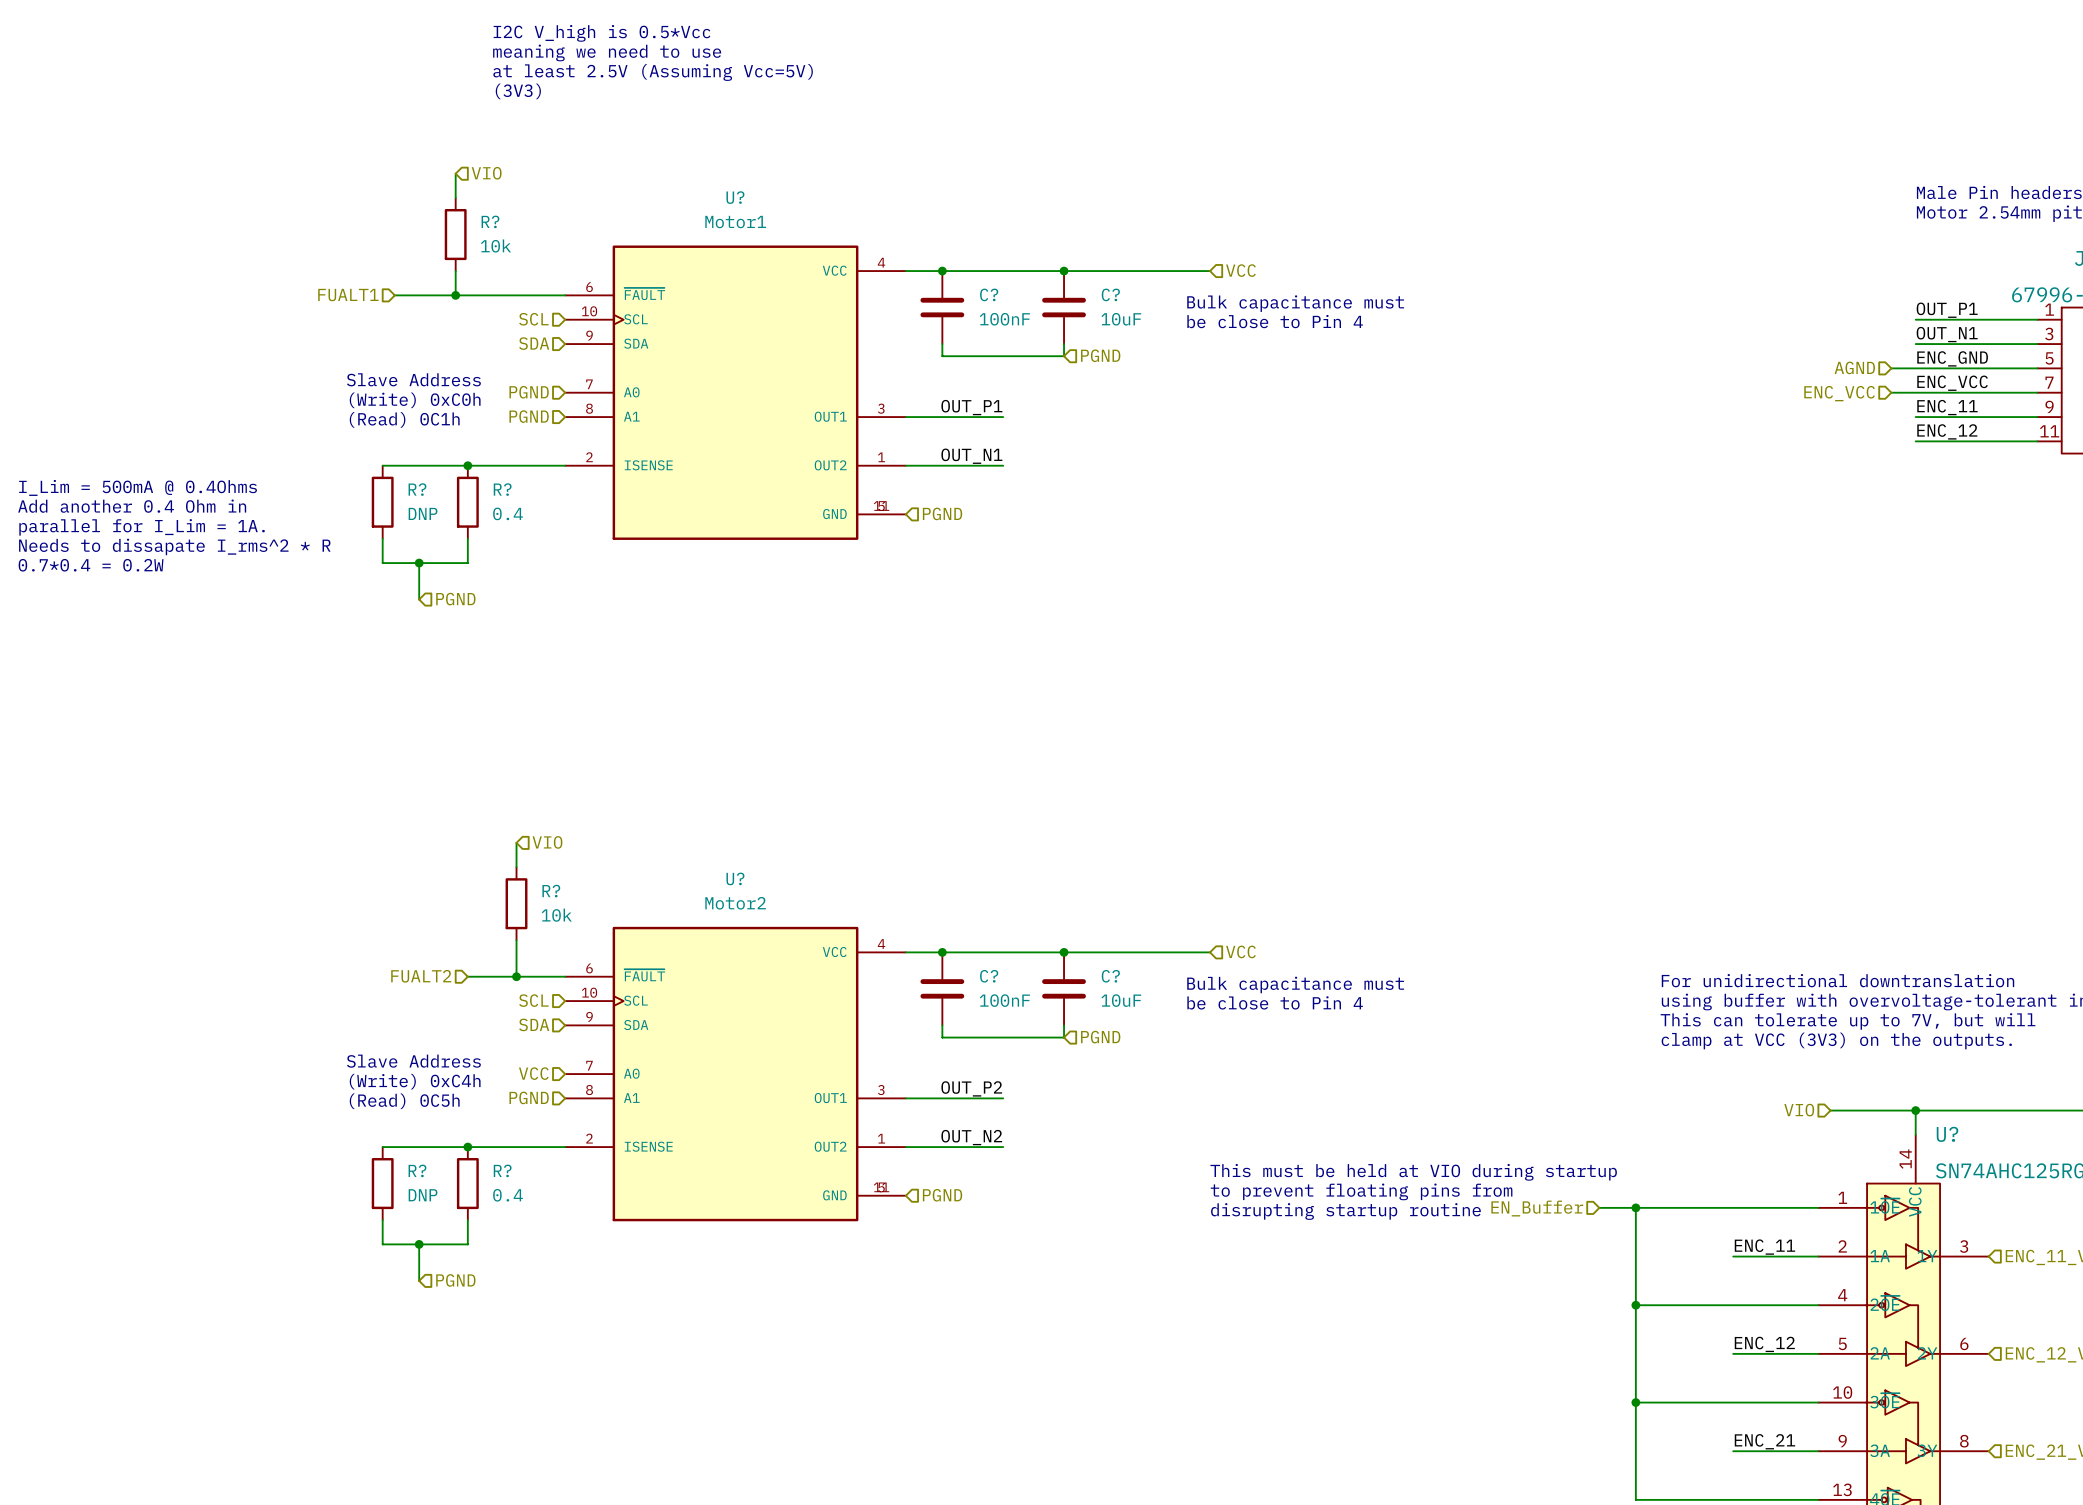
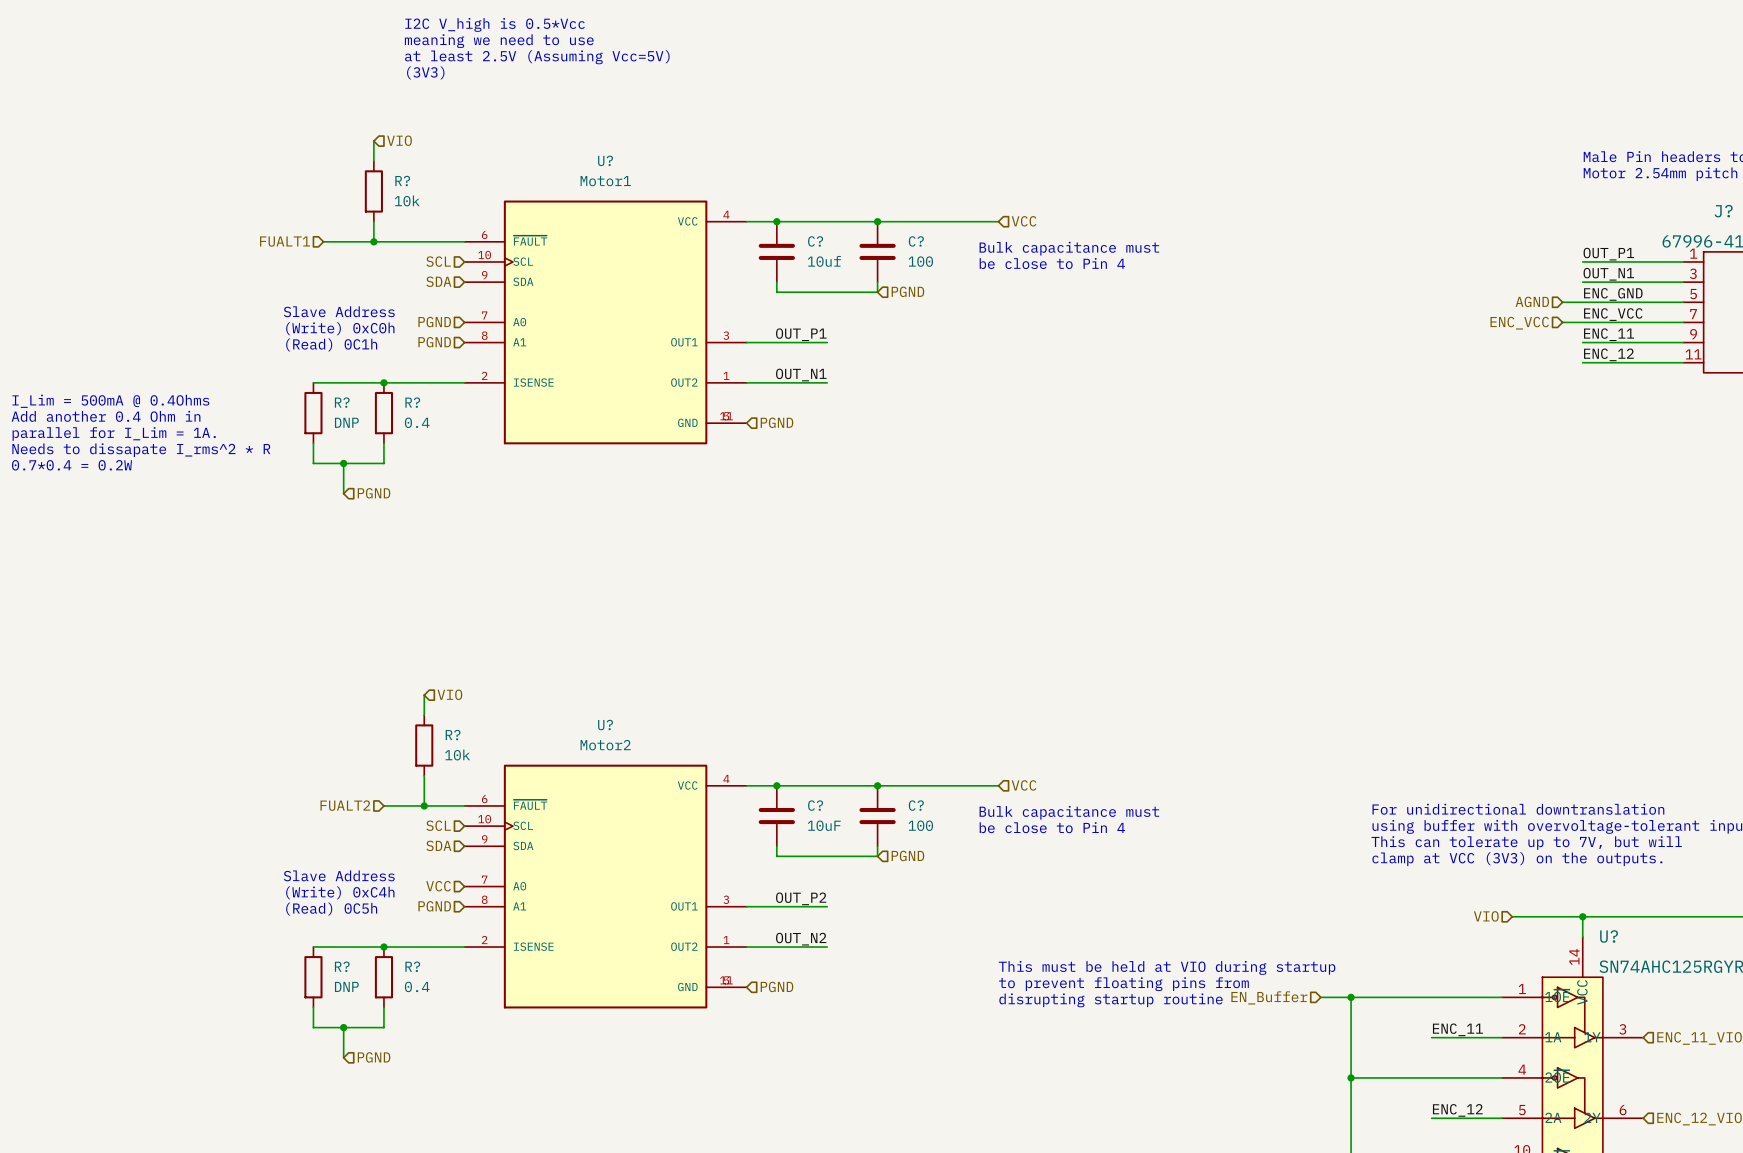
C? value: 100nF (1004, 319) -> 10uf (824, 261)
C? value: 10uF (1121, 319) -> 100 (920, 261)
C? value: 100nF (1004, 1000) -> 10uF (824, 825)
C? value: 10uF (1121, 1000) -> 100 (920, 825)

